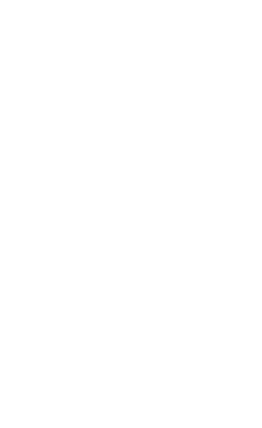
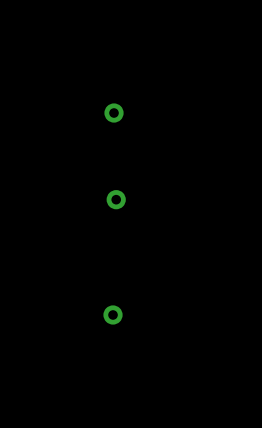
via: none -> (114, 113)
via: none -> (116, 199)
via: none -> (113, 314)

